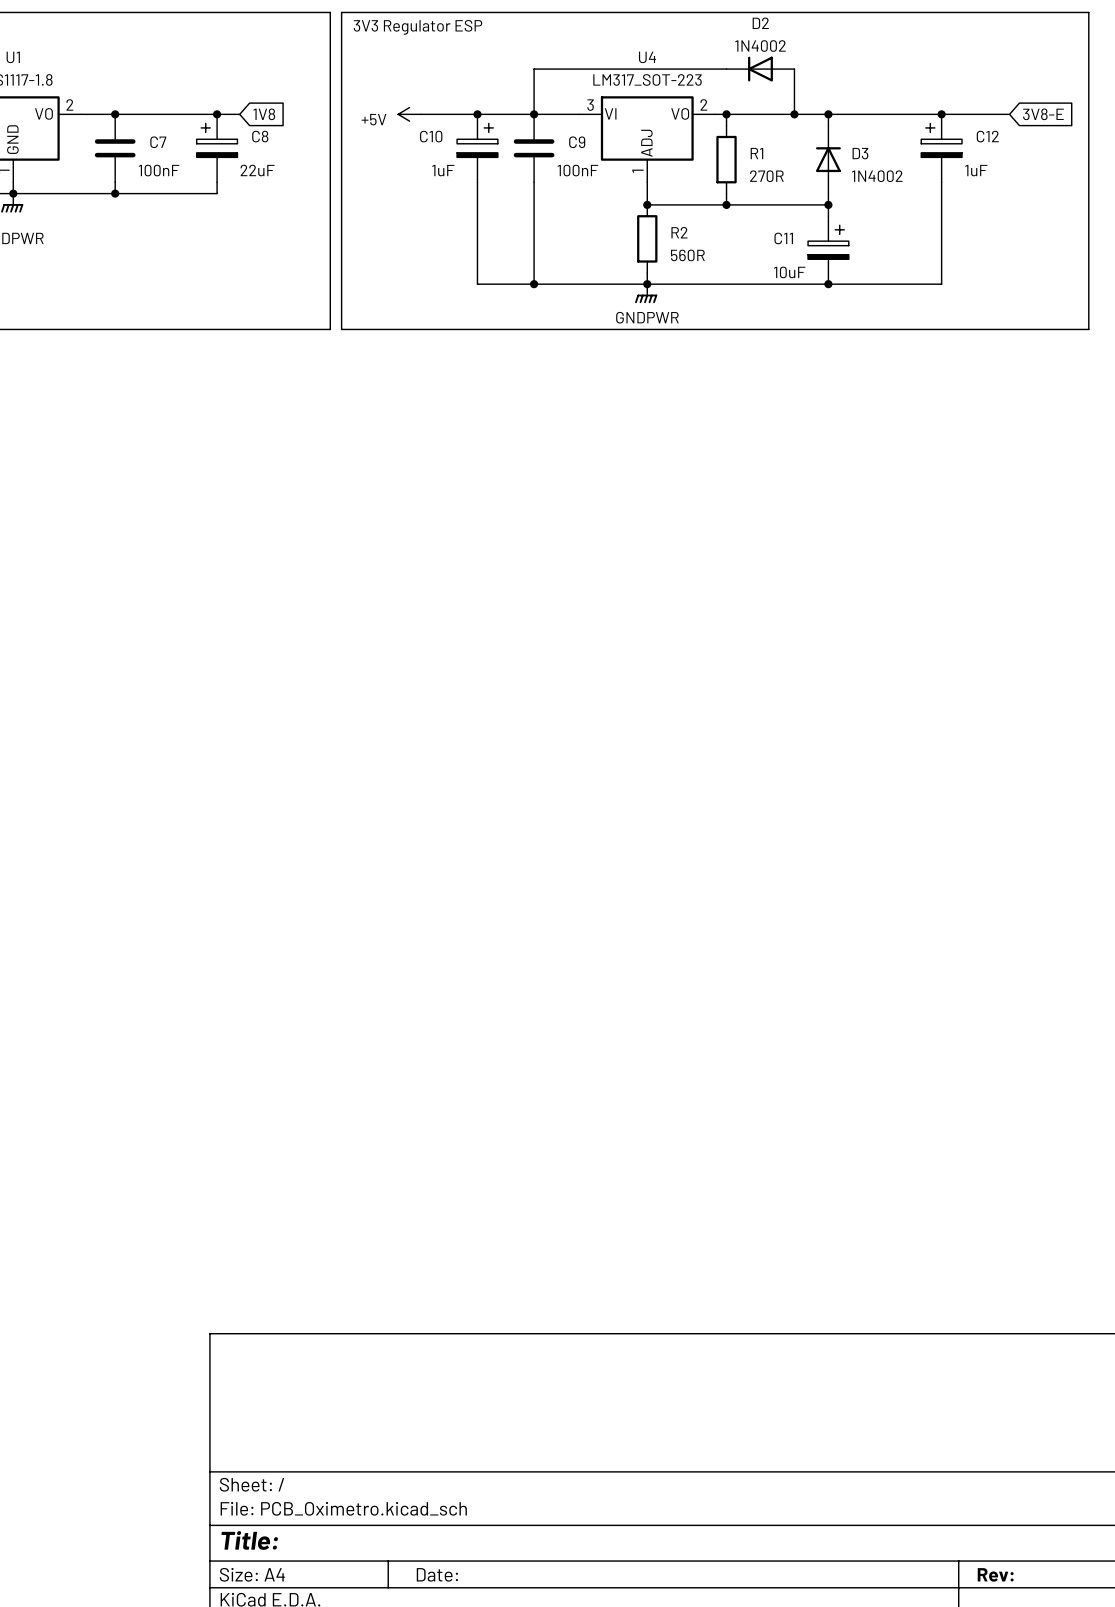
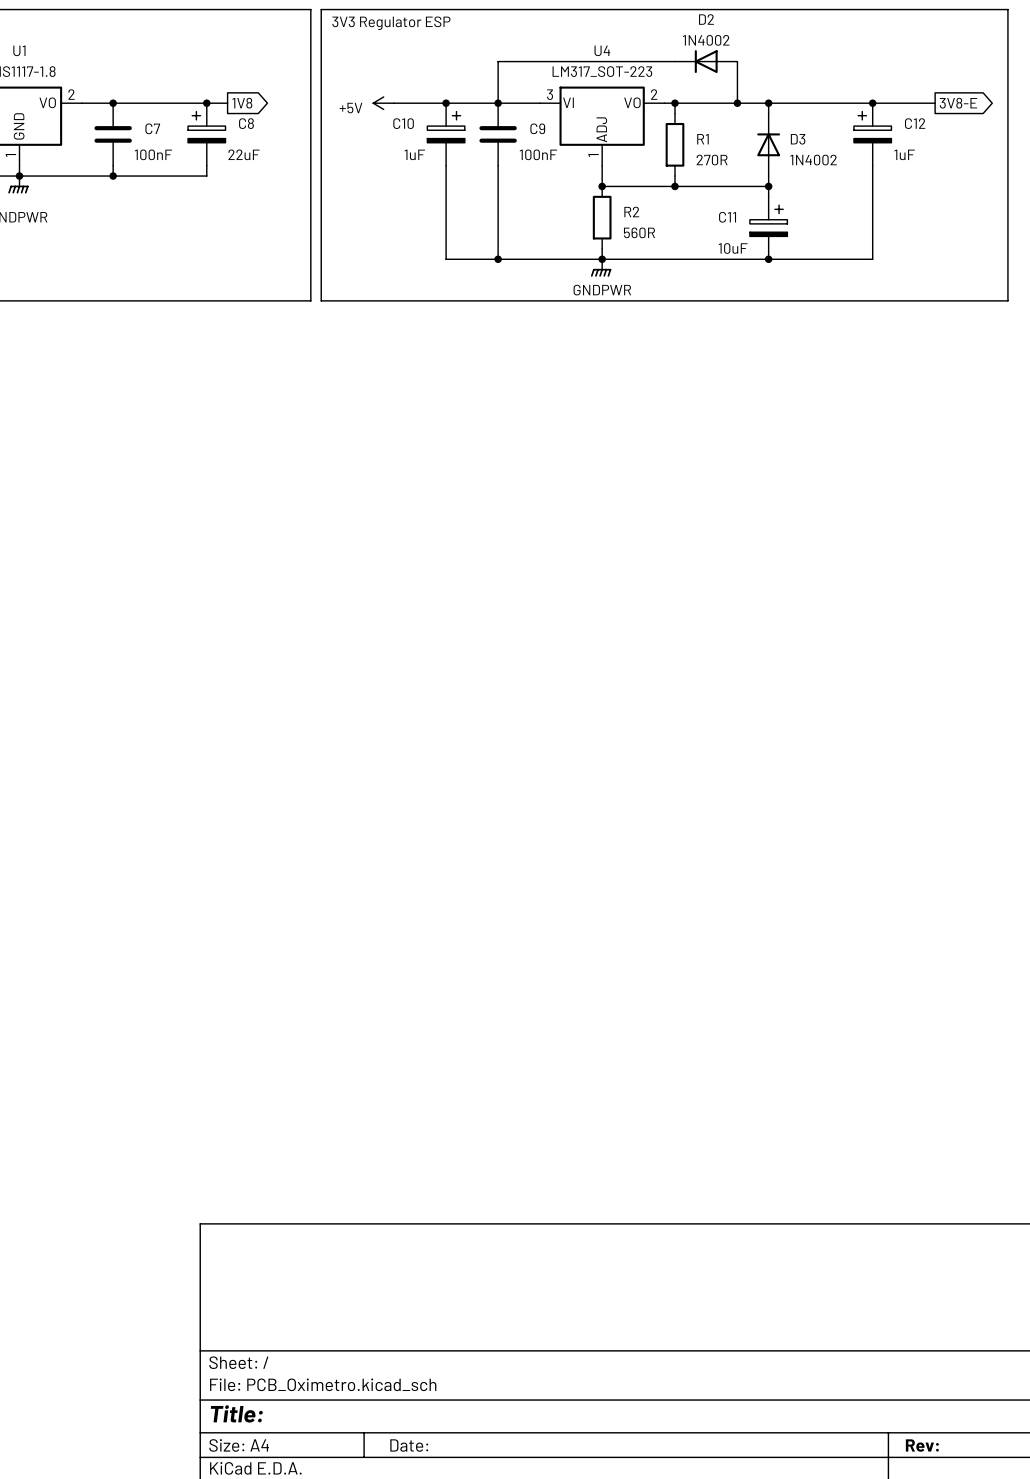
global label shape: input (264, 114) -> output (242, 103)
global label shape: input (1043, 114) -> output (958, 103)

